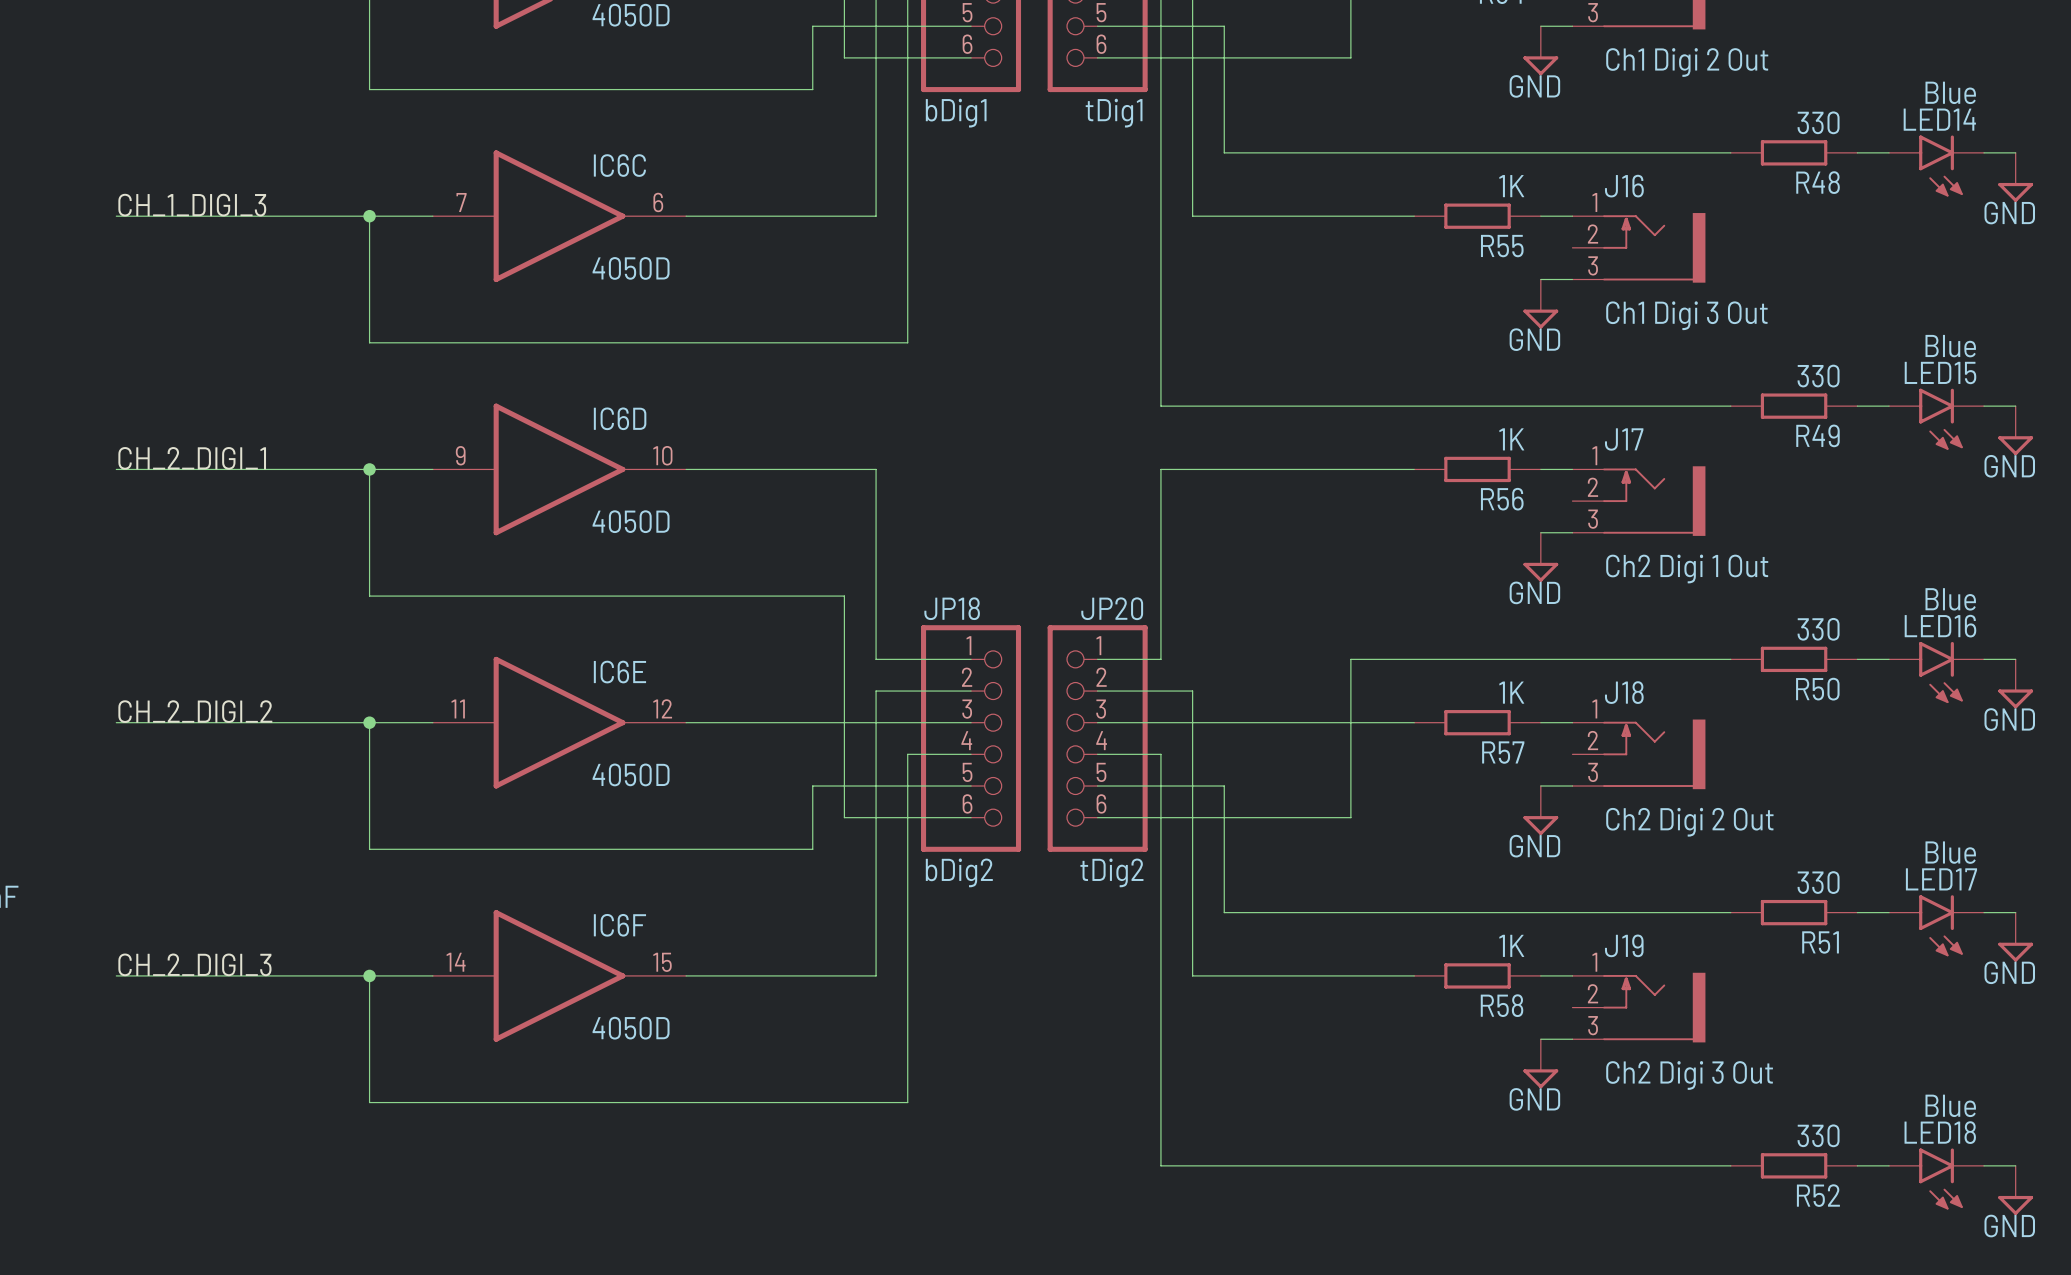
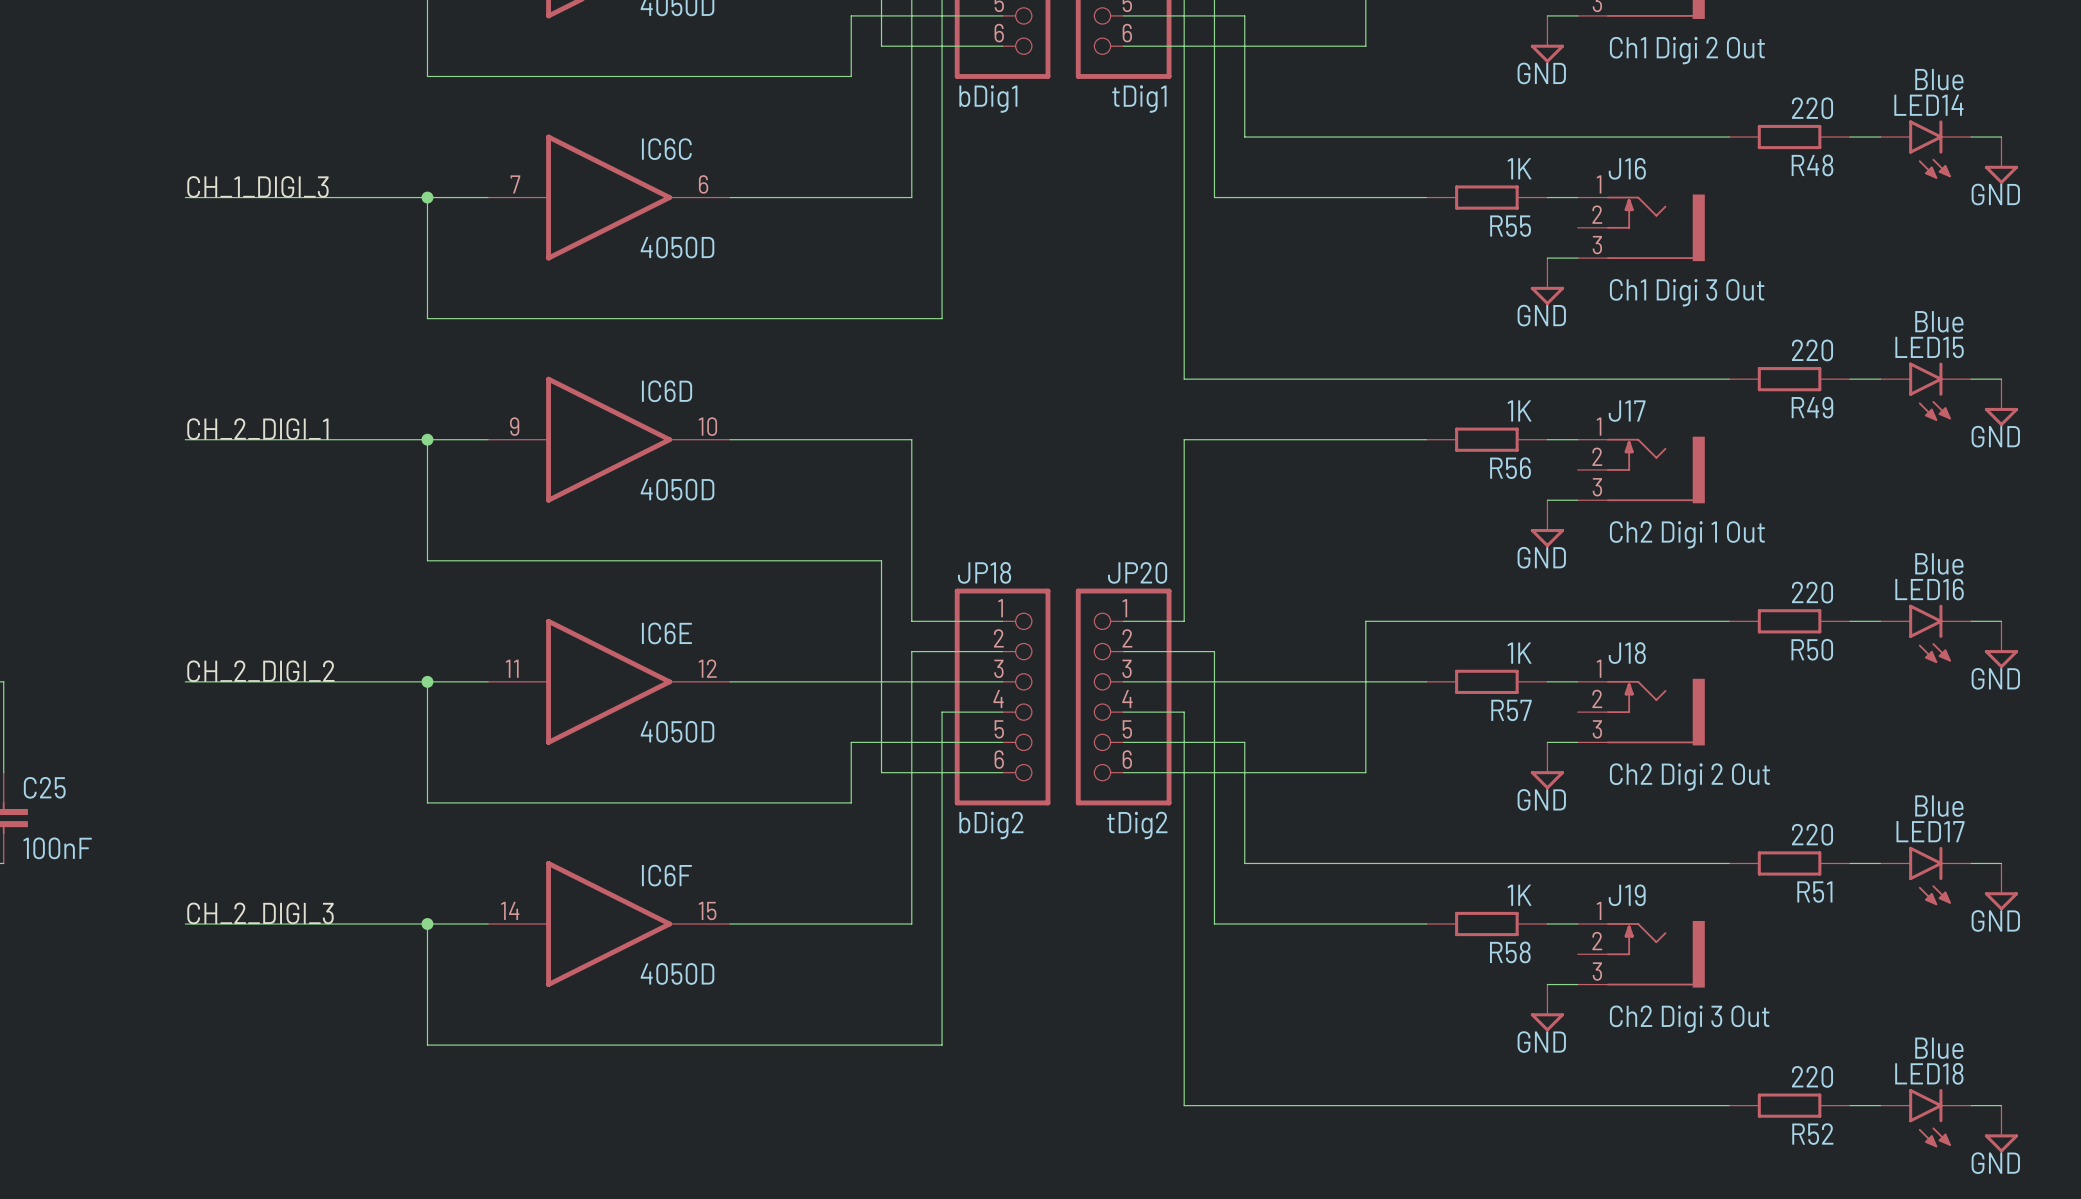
R48 value: 330 (1818, 122) -> 220 (1812, 108)
R49 value: 330 (1818, 376) -> 220 (1812, 350)
R50 value: 330 (1818, 629) -> 220 (1812, 592)
R51 value: 330 (1818, 882) -> 220 (1812, 834)
R52 value: 330 (1818, 1135) -> 220 (1812, 1076)

